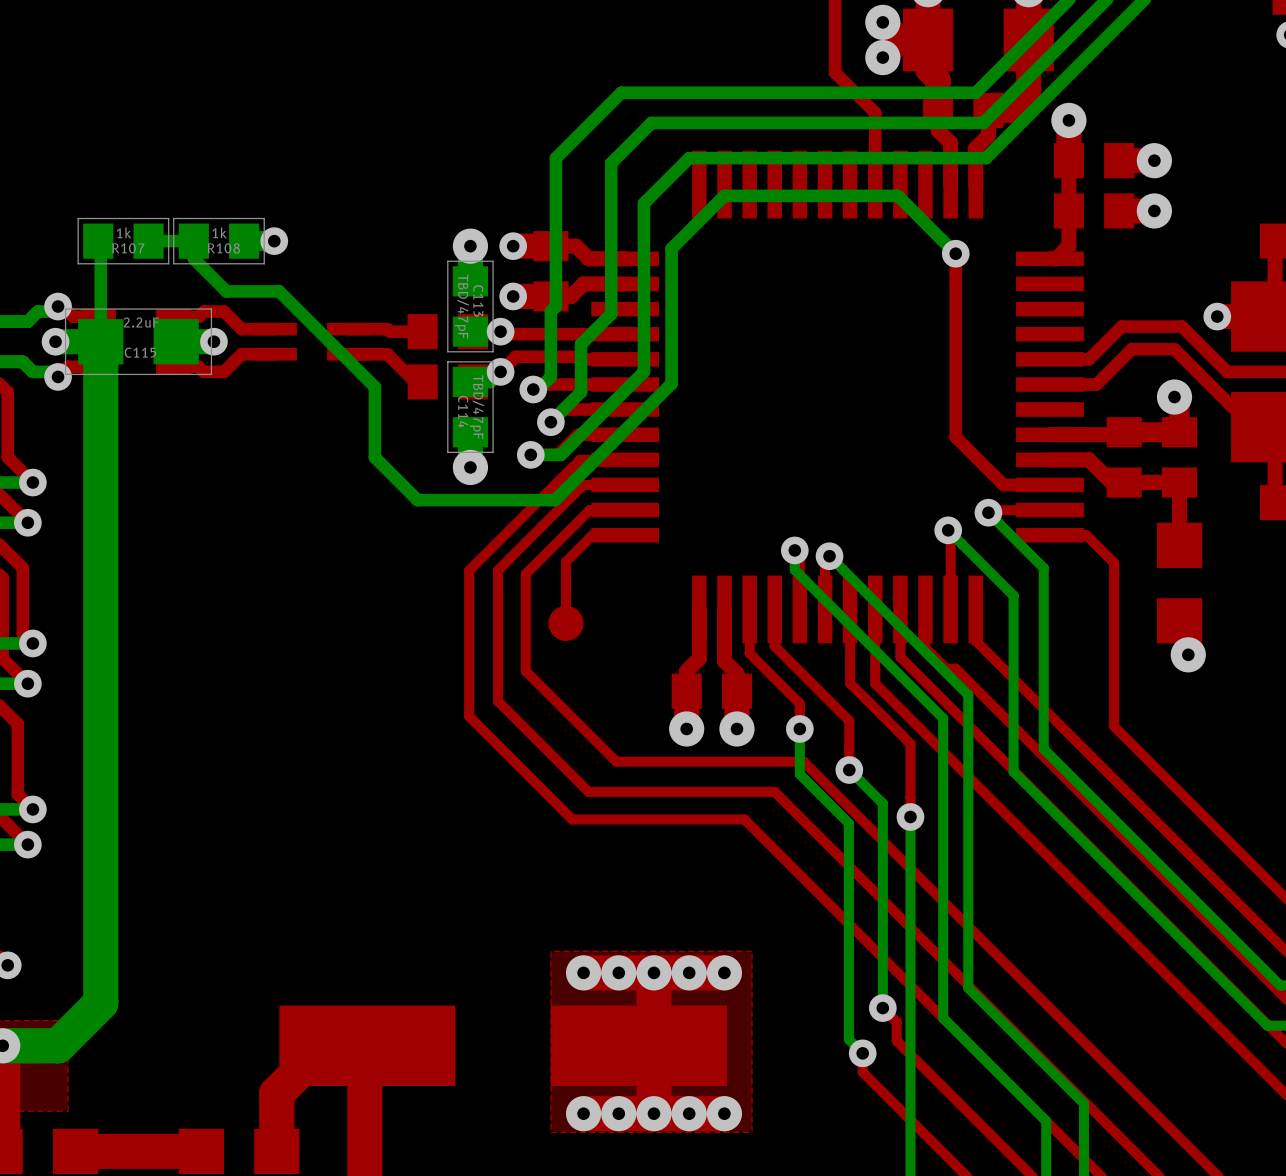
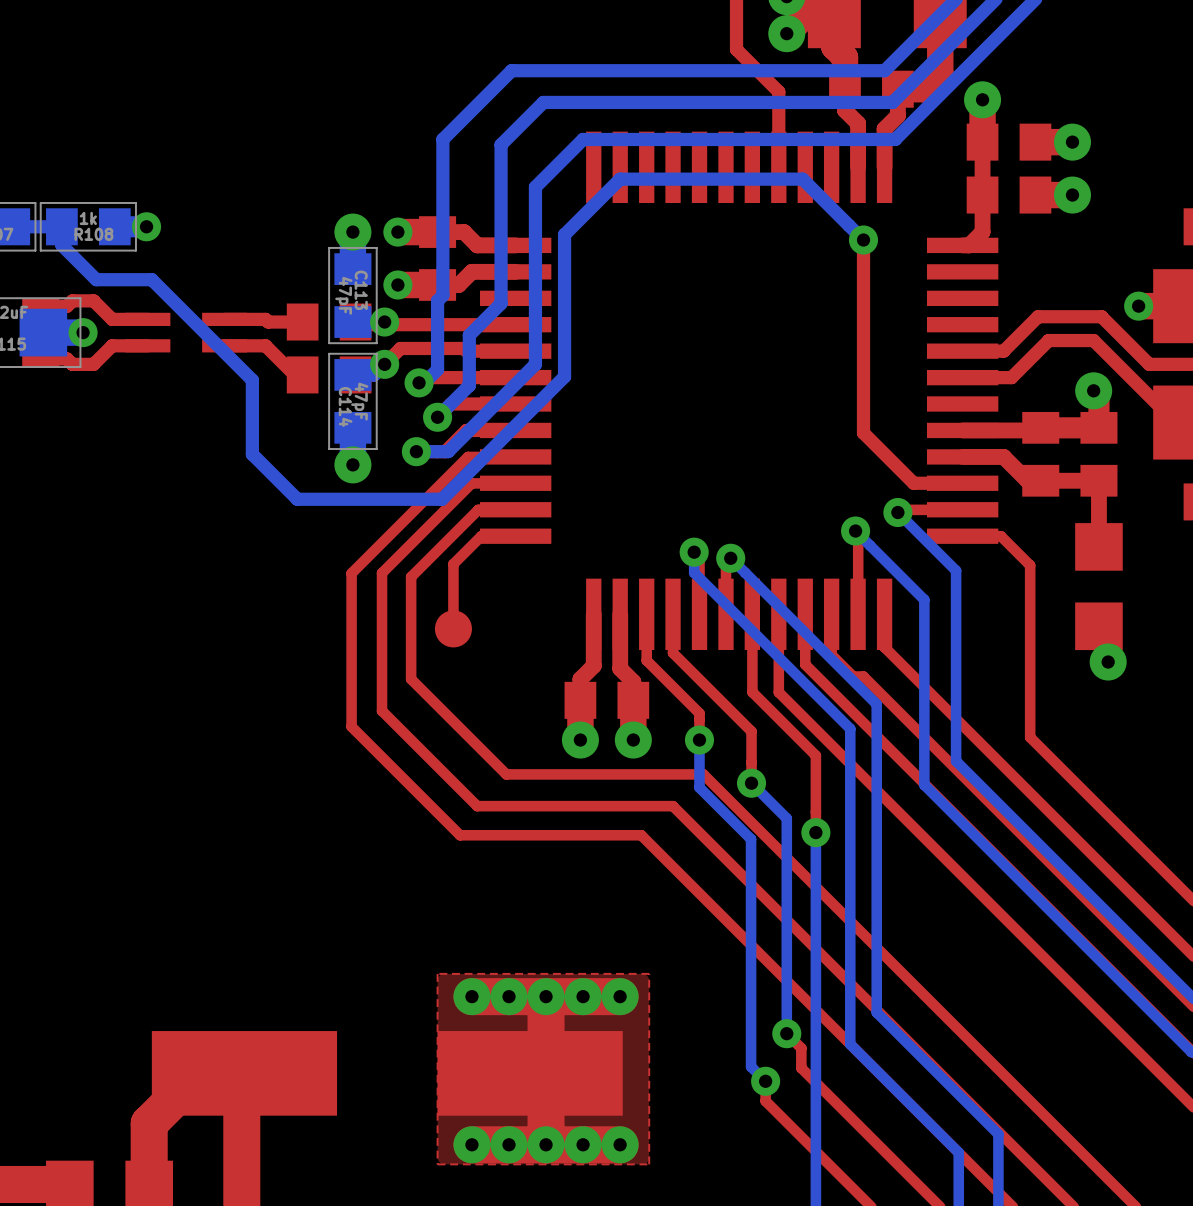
C113 value: TBD/47pF (461, 306) -> 47pF (343, 295)
C114 value: TBD/47pF (476, 407) -> 47pF (359, 401)

